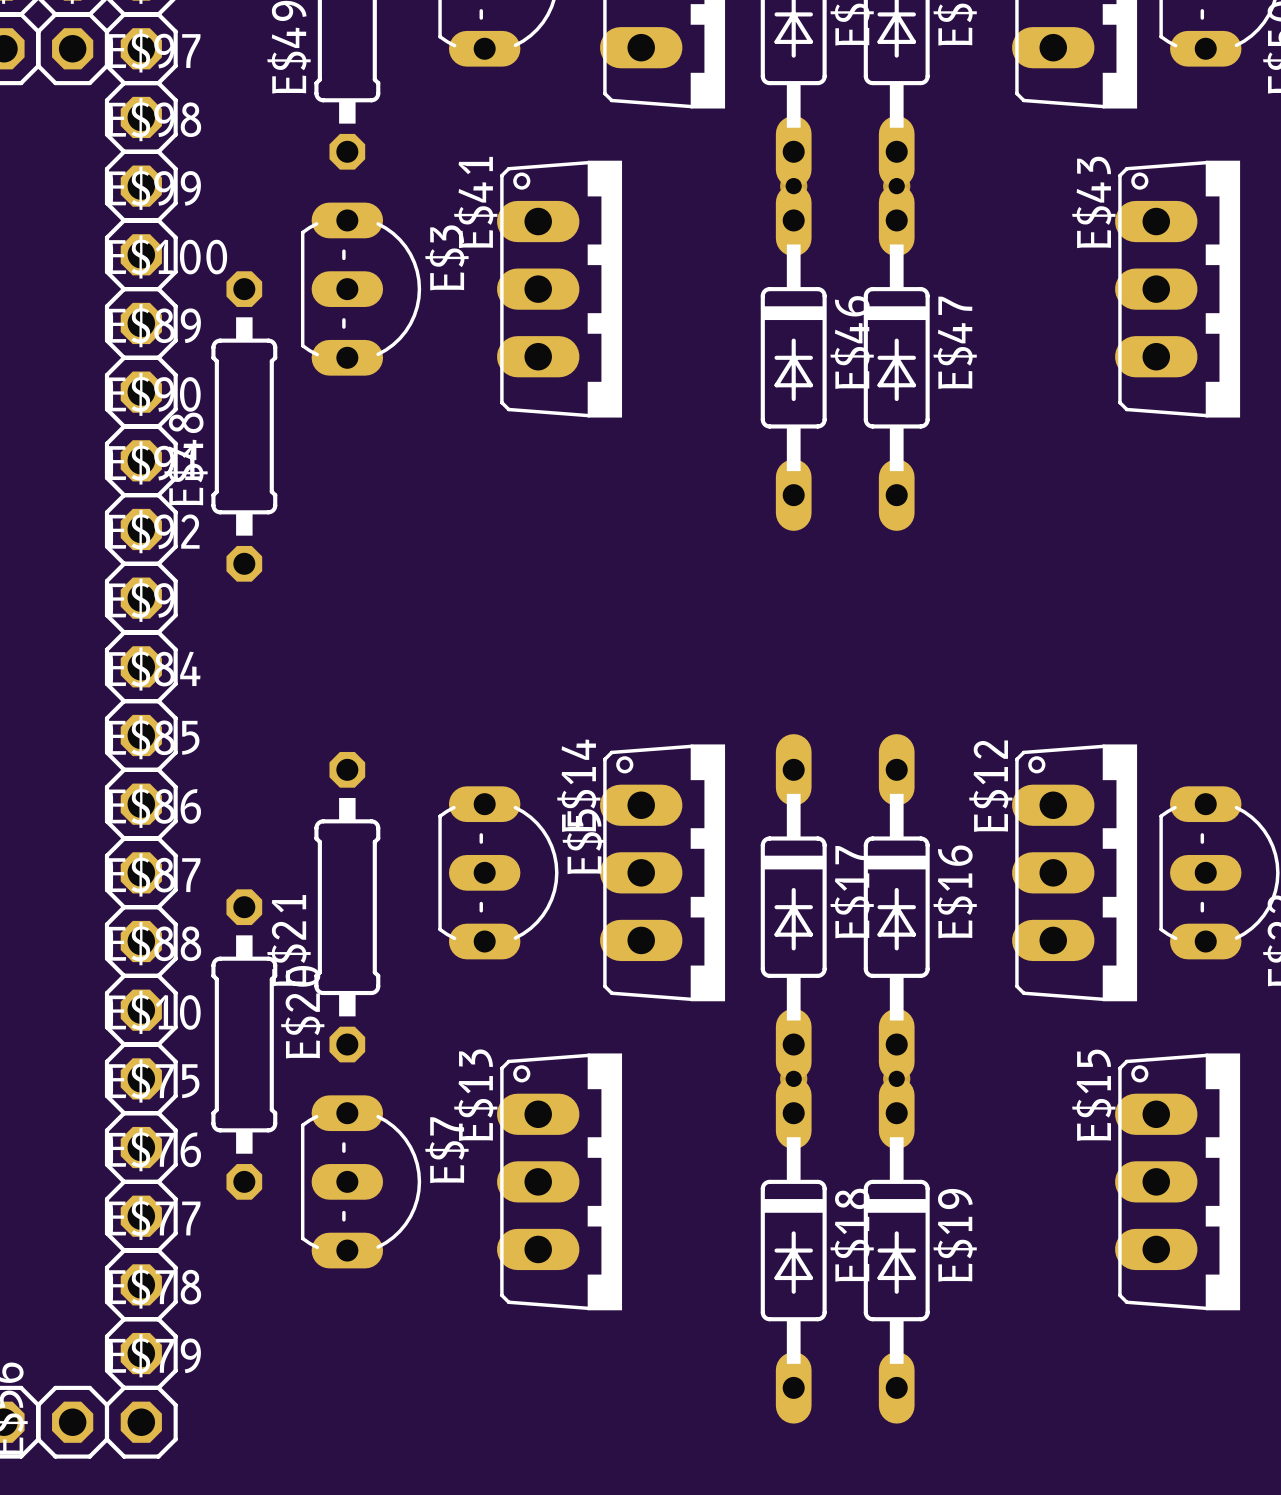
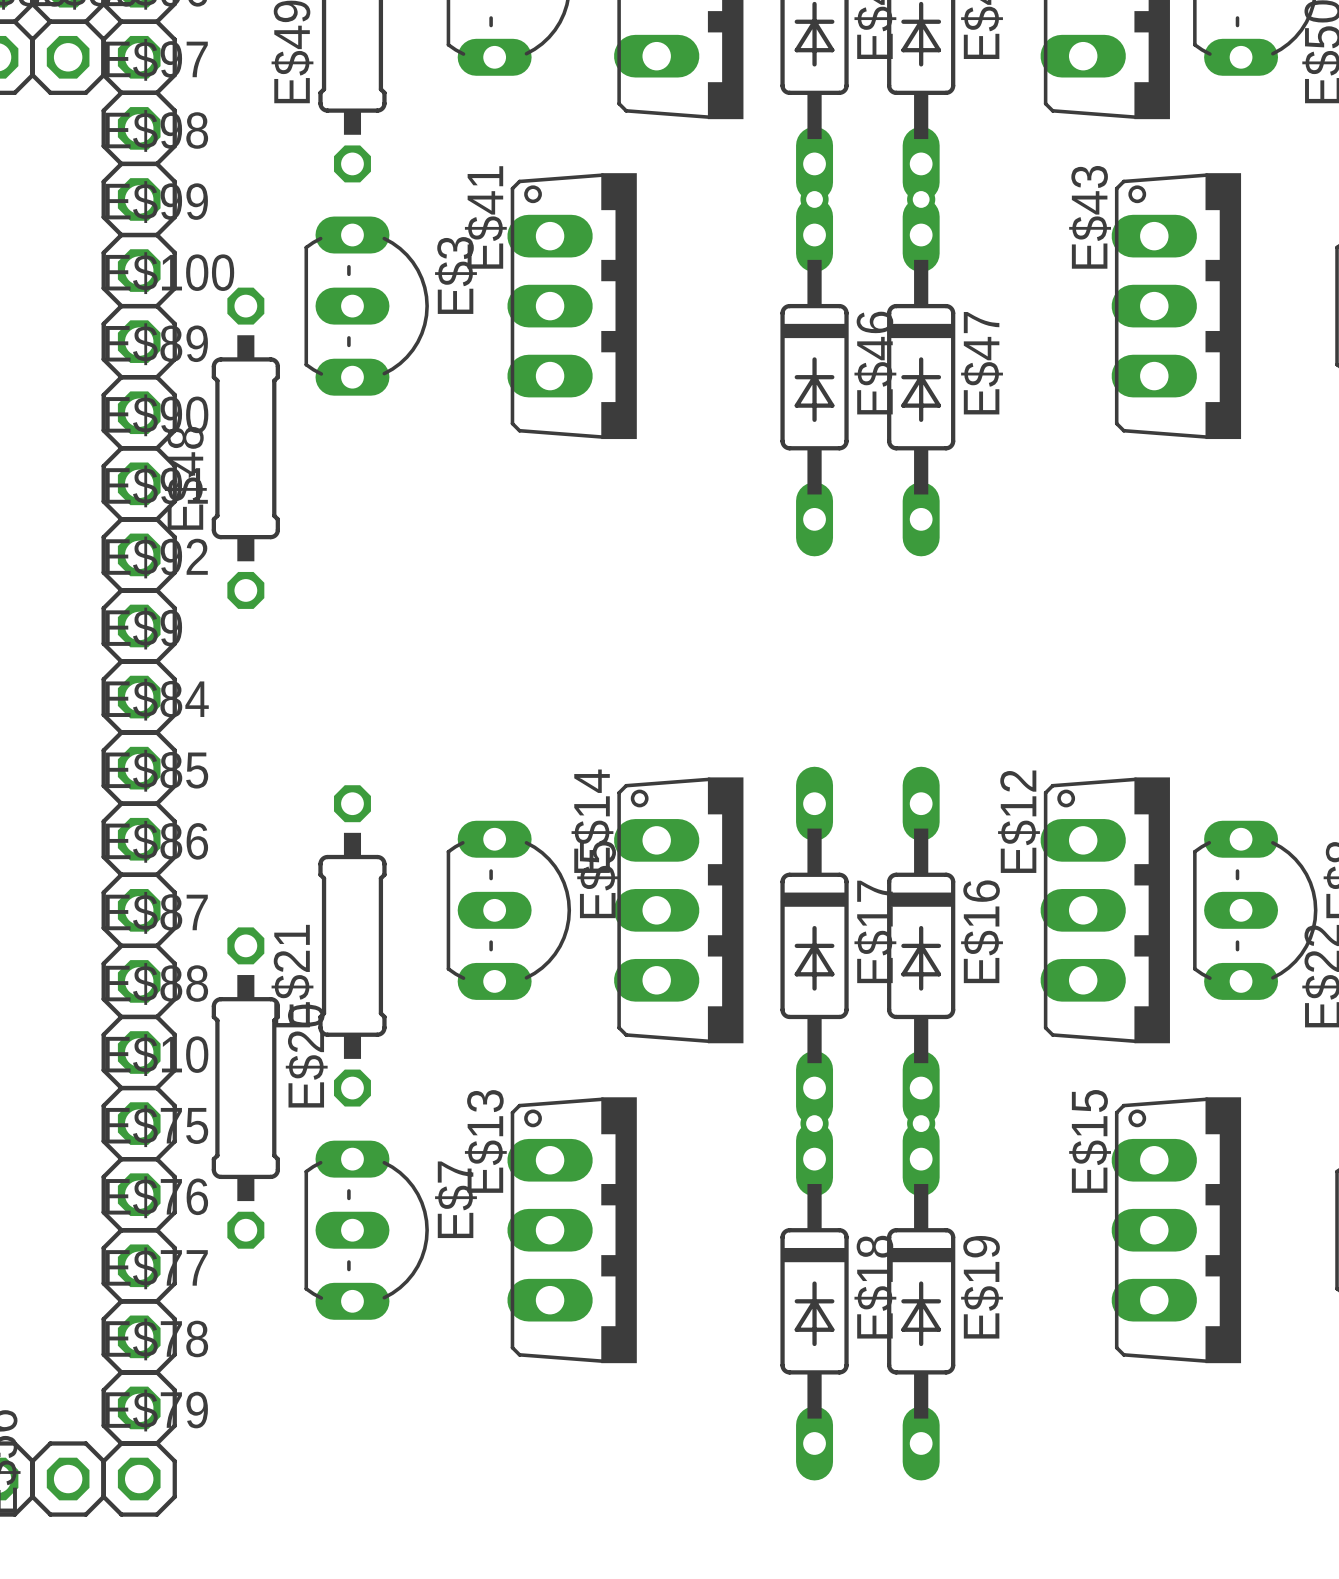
E$43 position: (1177, 289) -> (1176, 306)
E$15 position: (1177, 1181) -> (1176, 1230)

